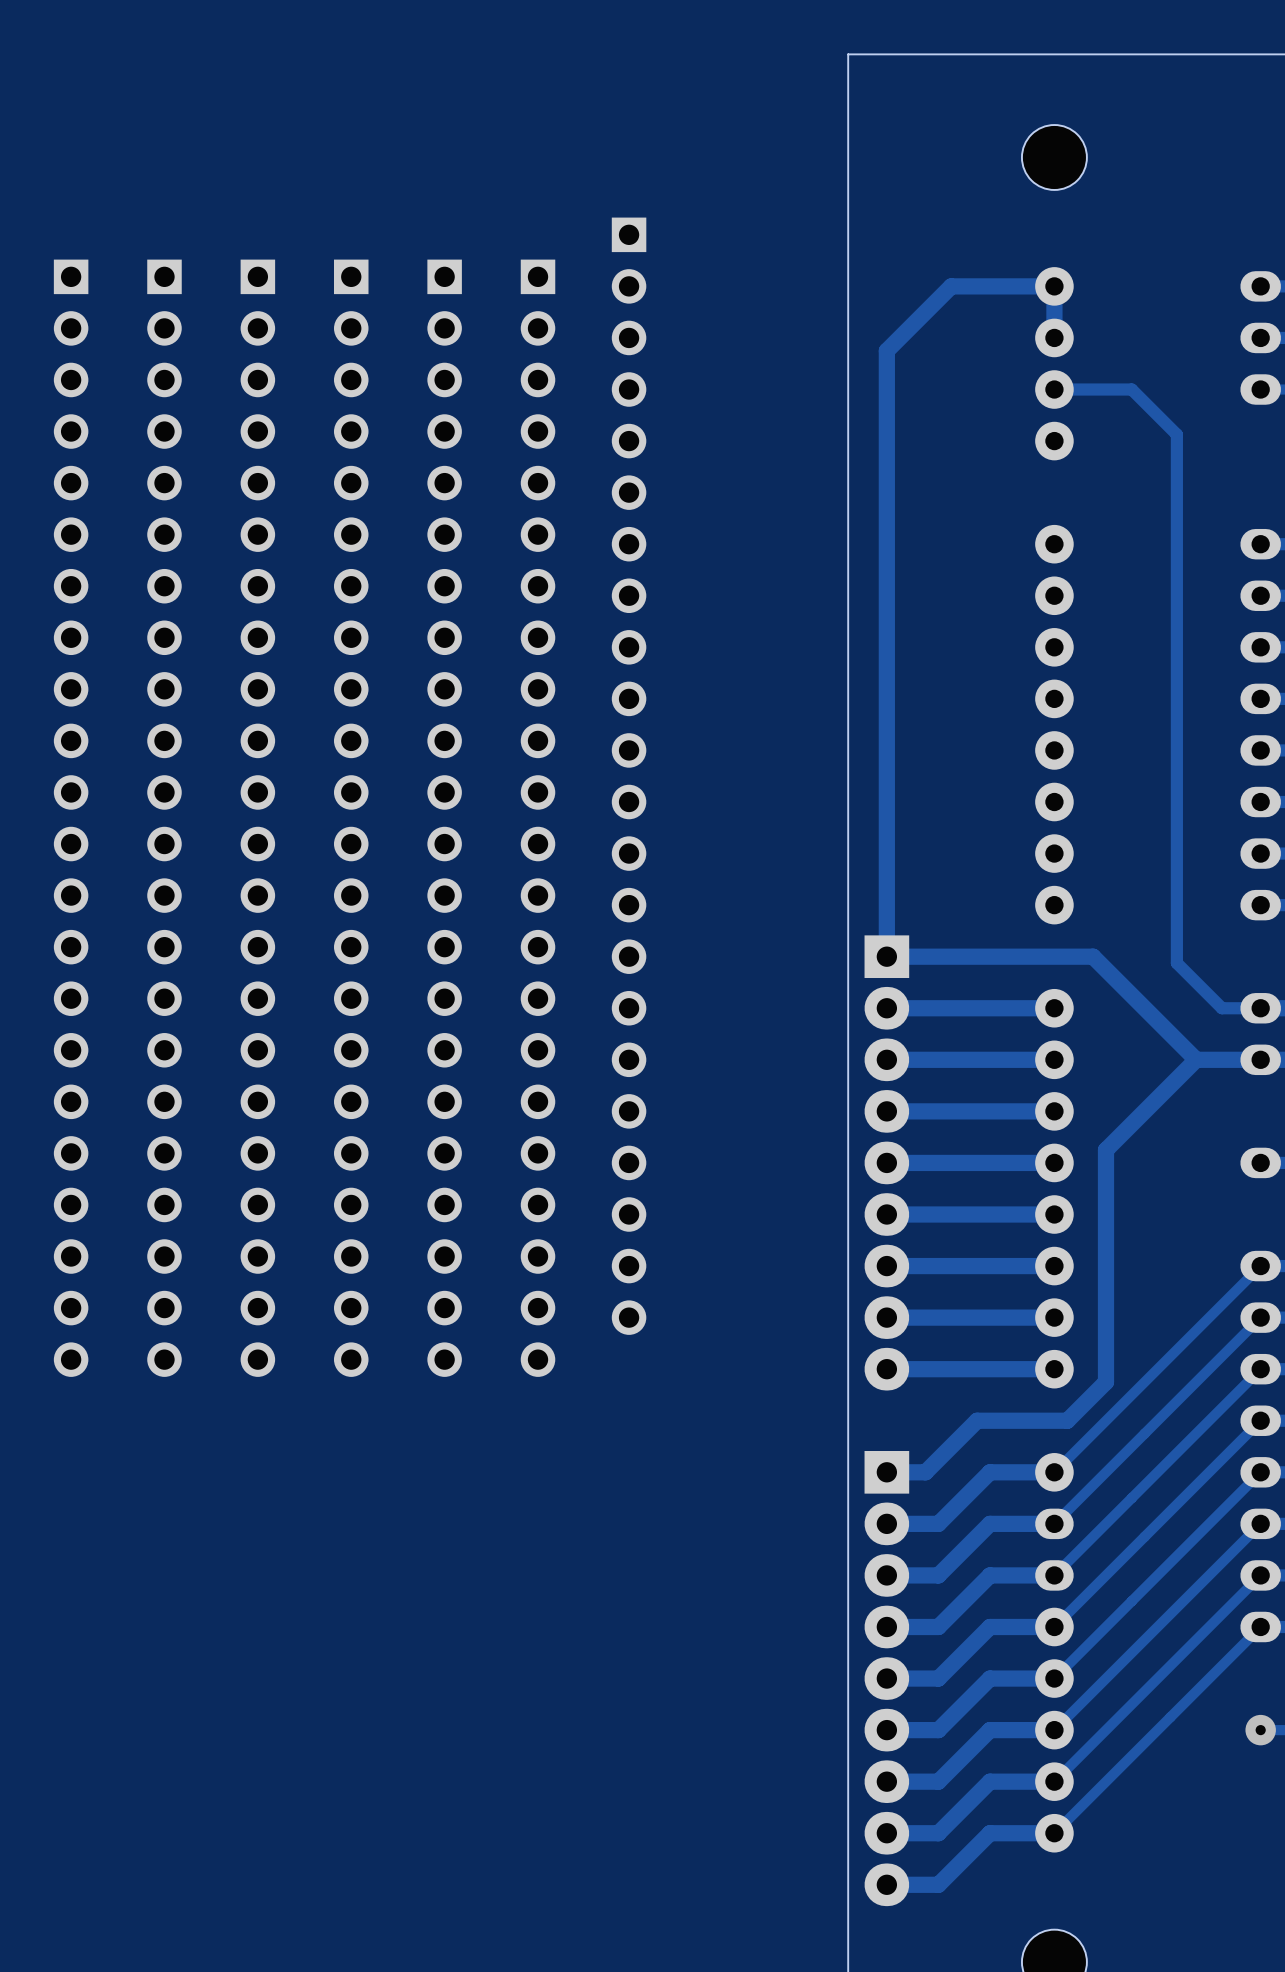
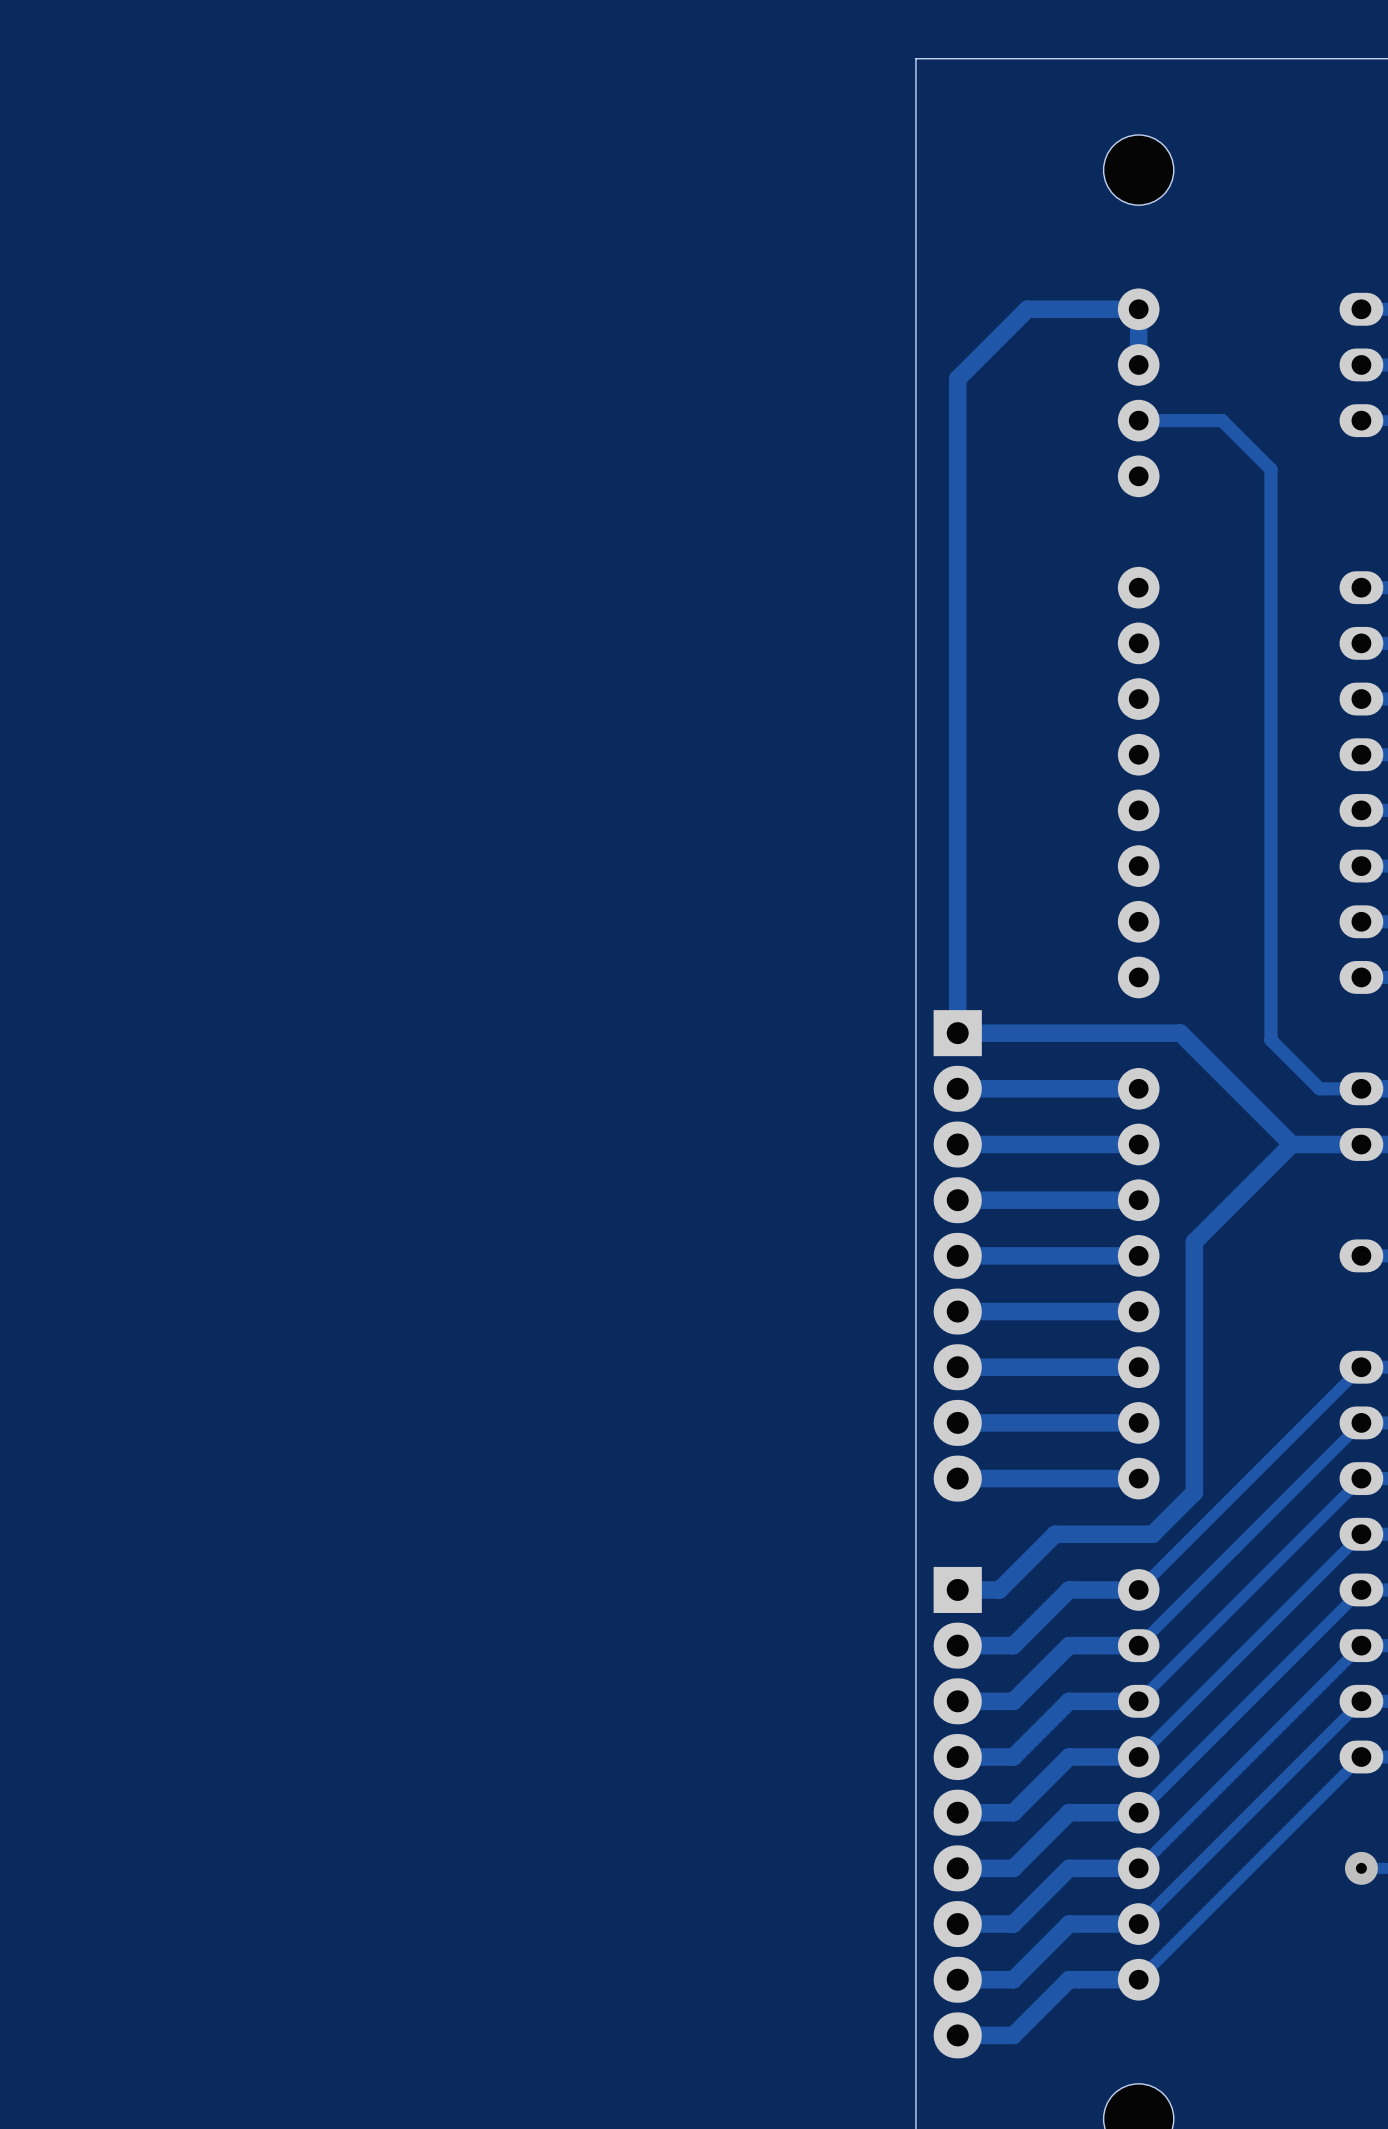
part: (629, 776) -> none
part: (71, 818) -> none
part: (164, 818) -> none
part: (257, 818) -> none
part: (351, 818) -> none
part: (444, 818) -> none
part: (538, 818) -> none

